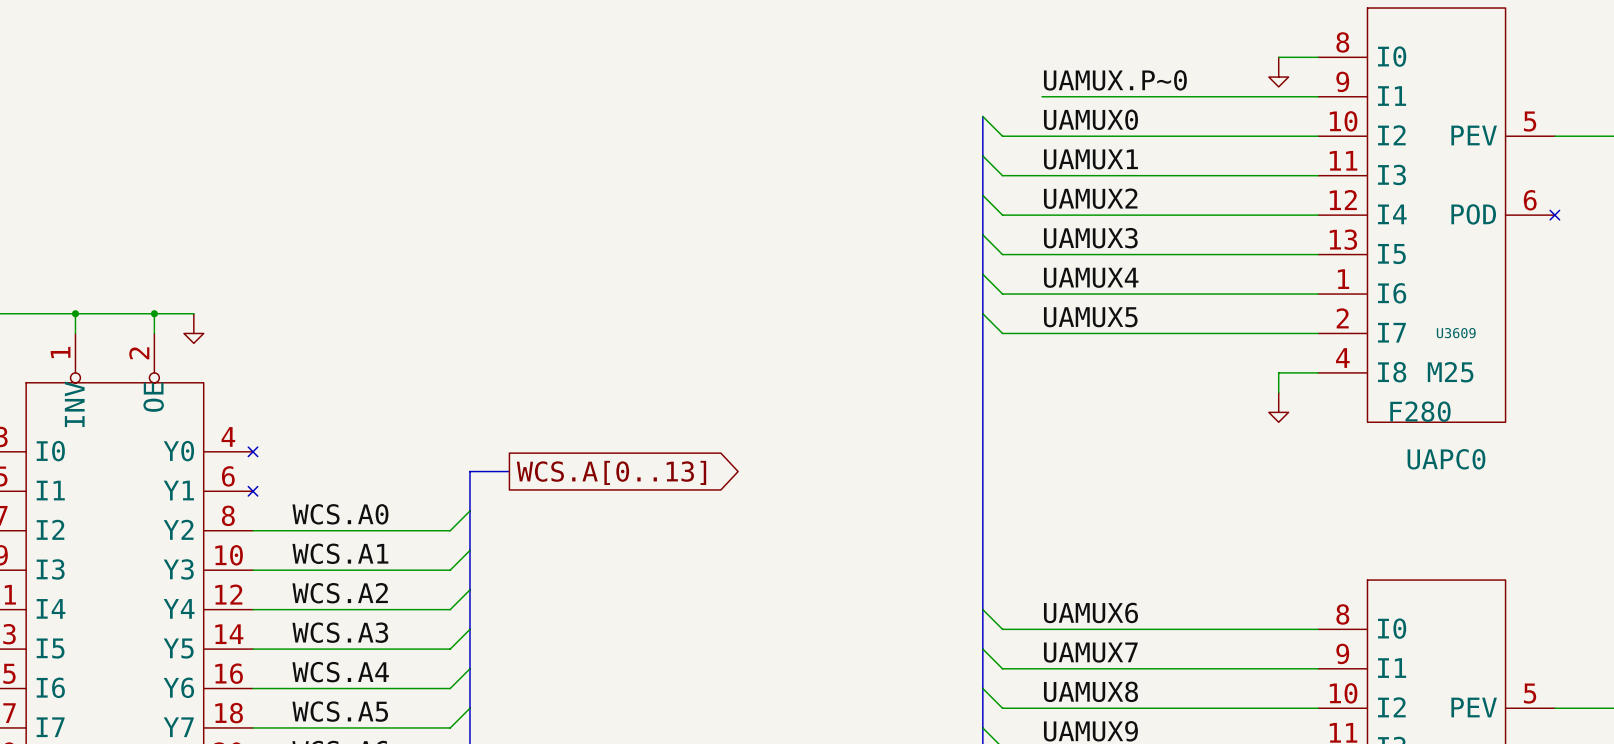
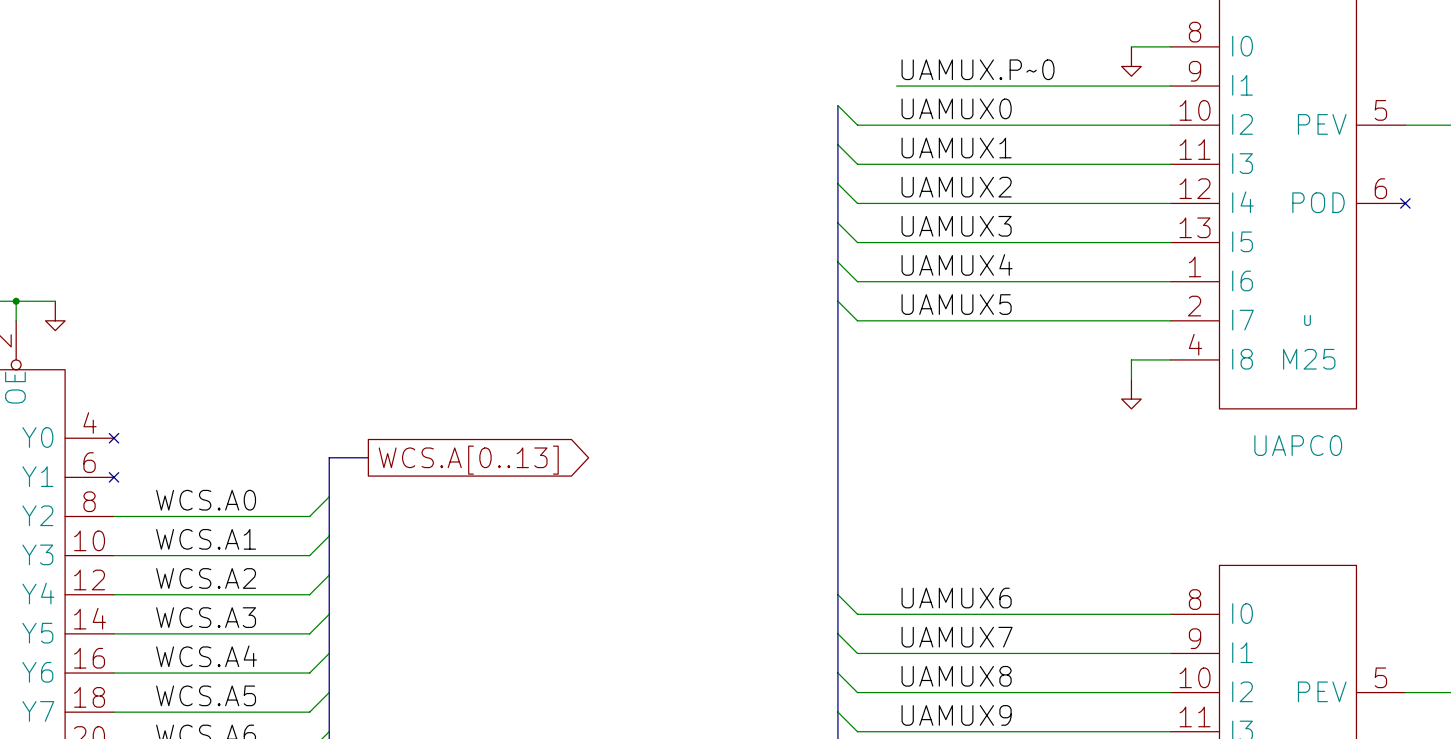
U3609 name: U3609 (1456, 333) -> U (1307, 320)
U3609 value: F280 (1420, 411) -> none

